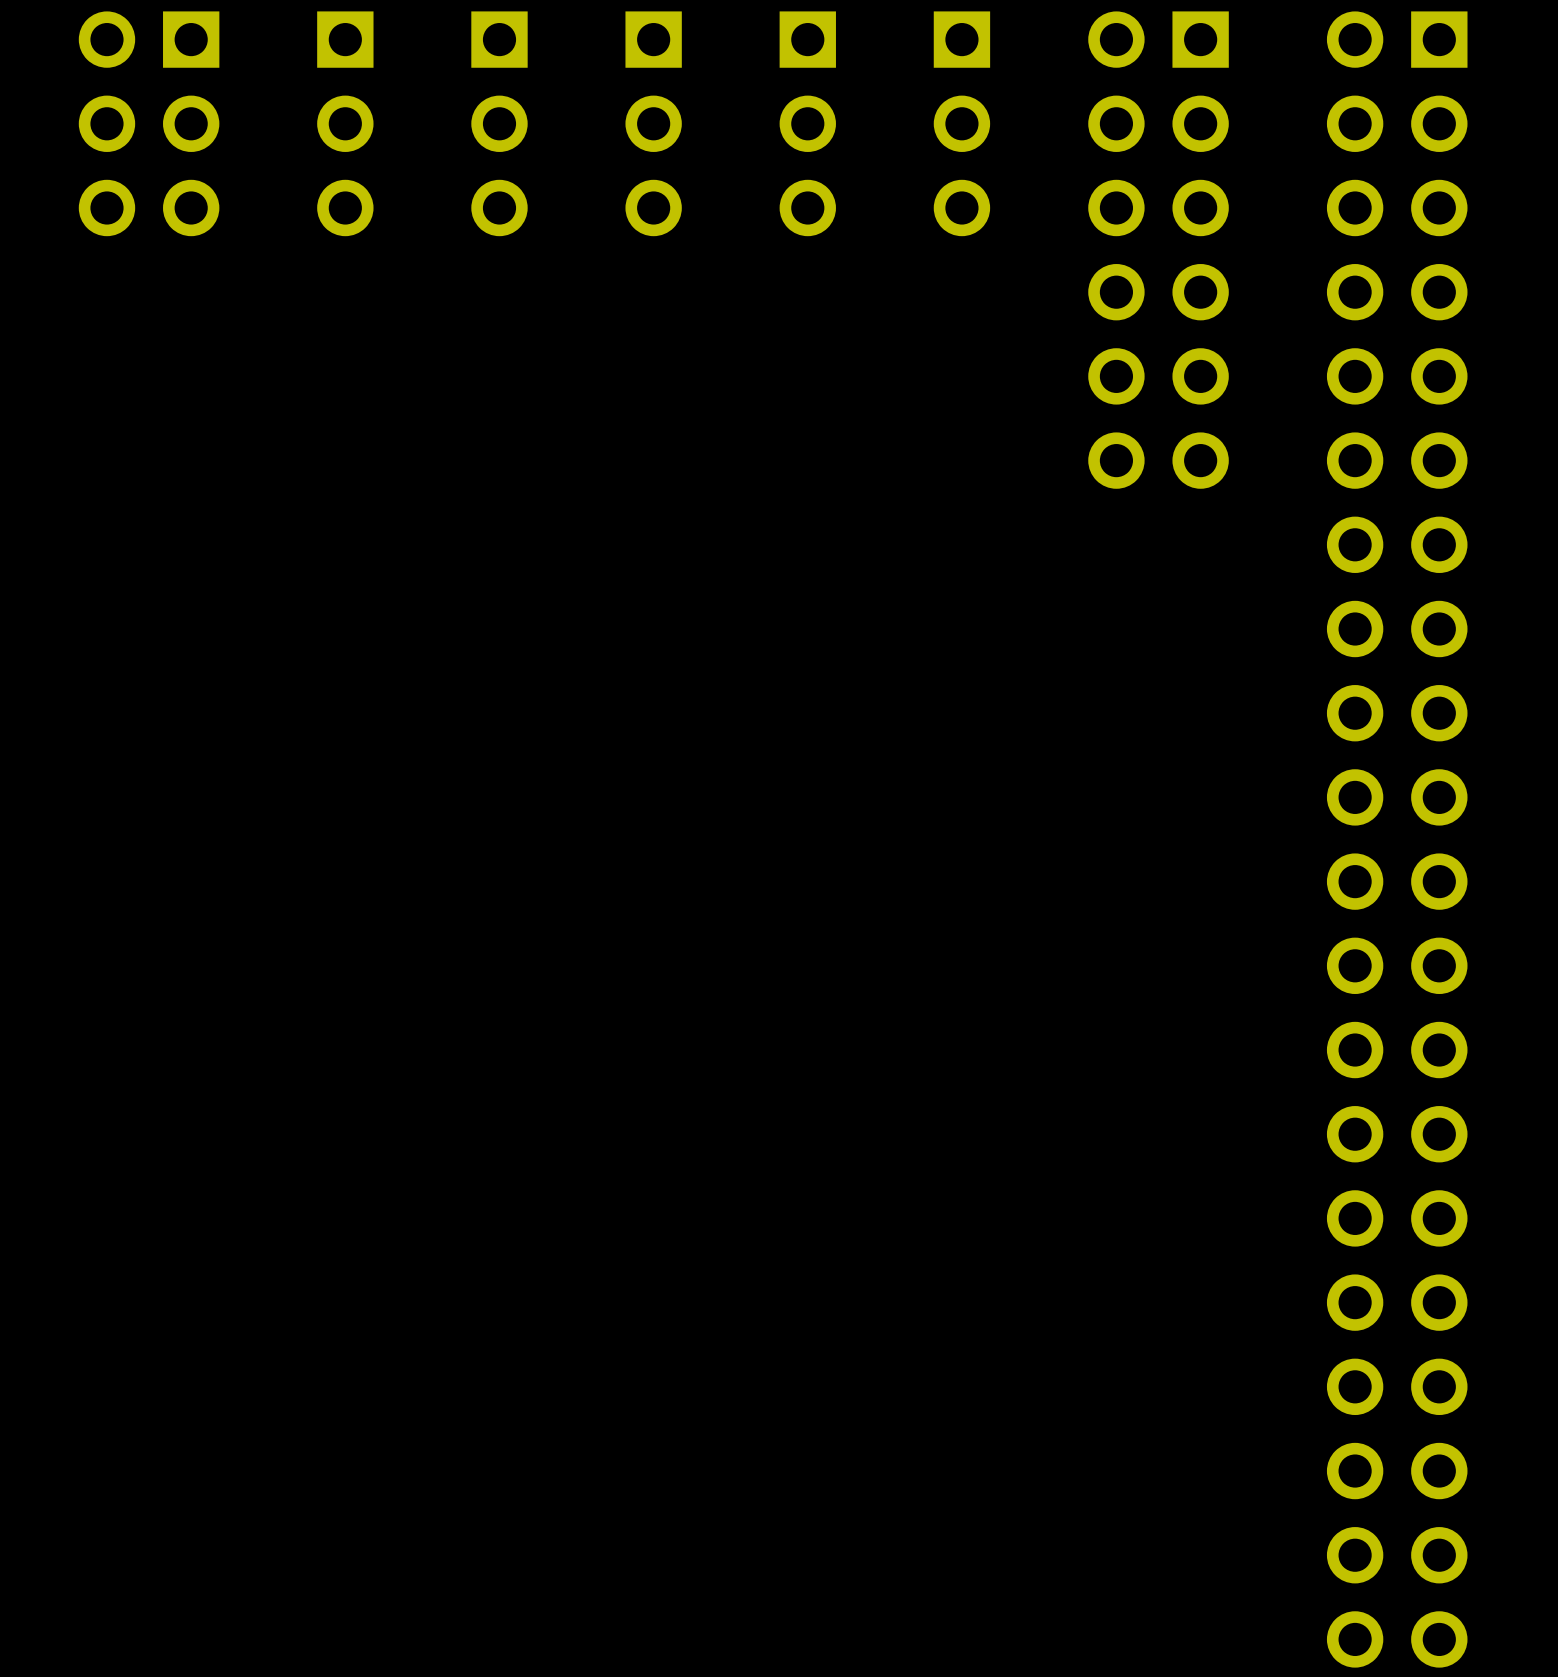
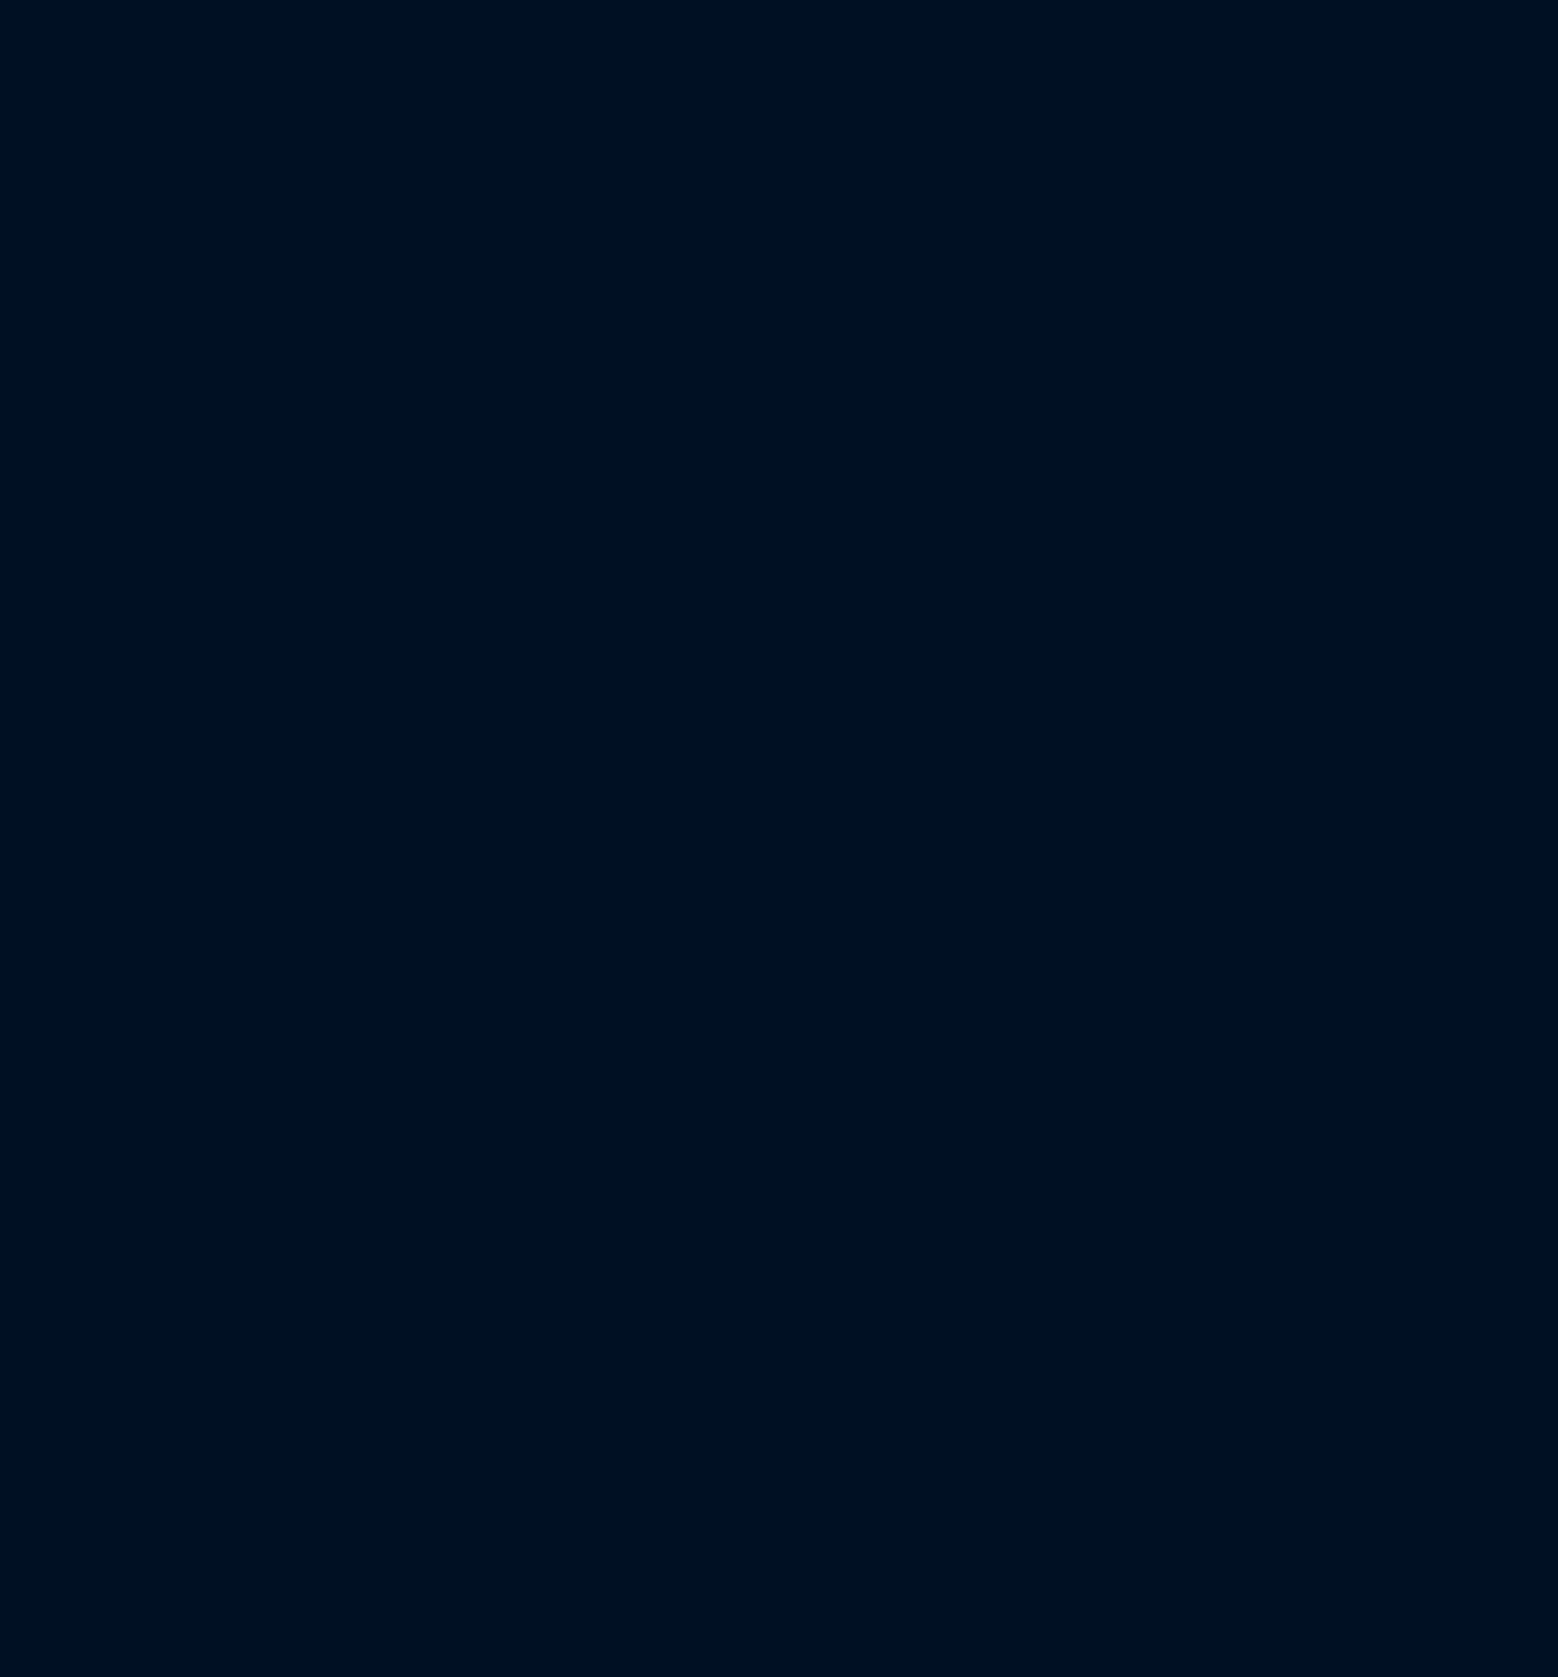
part: (149, 123) -> none
part: (345, 123) -> none
part: (499, 123) -> none
part: (653, 123) -> none
part: (807, 123) -> none
part: (961, 123) -> none
part: (1158, 250) -> none
part: (1397, 839) -> none

